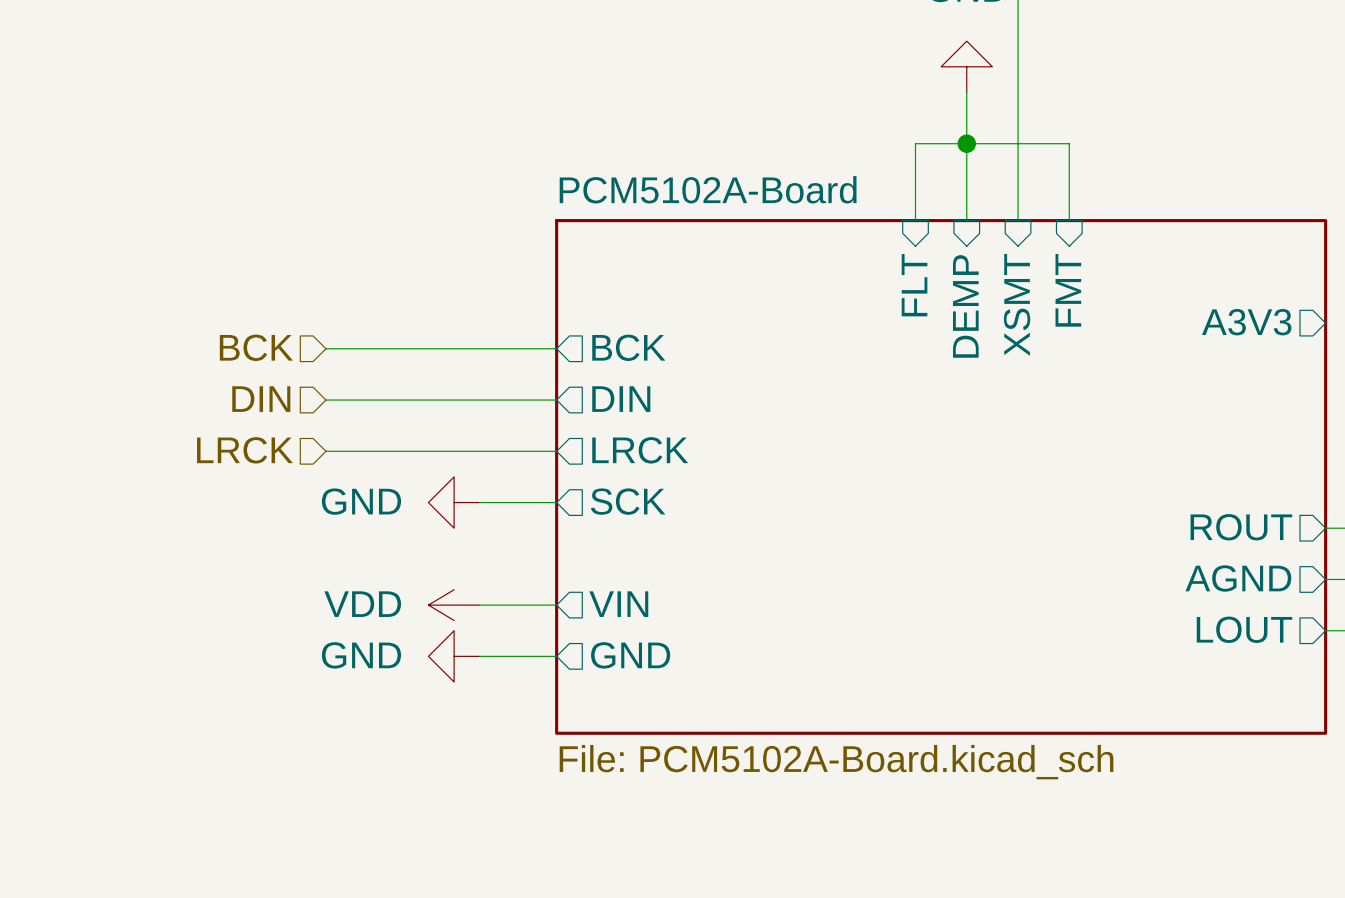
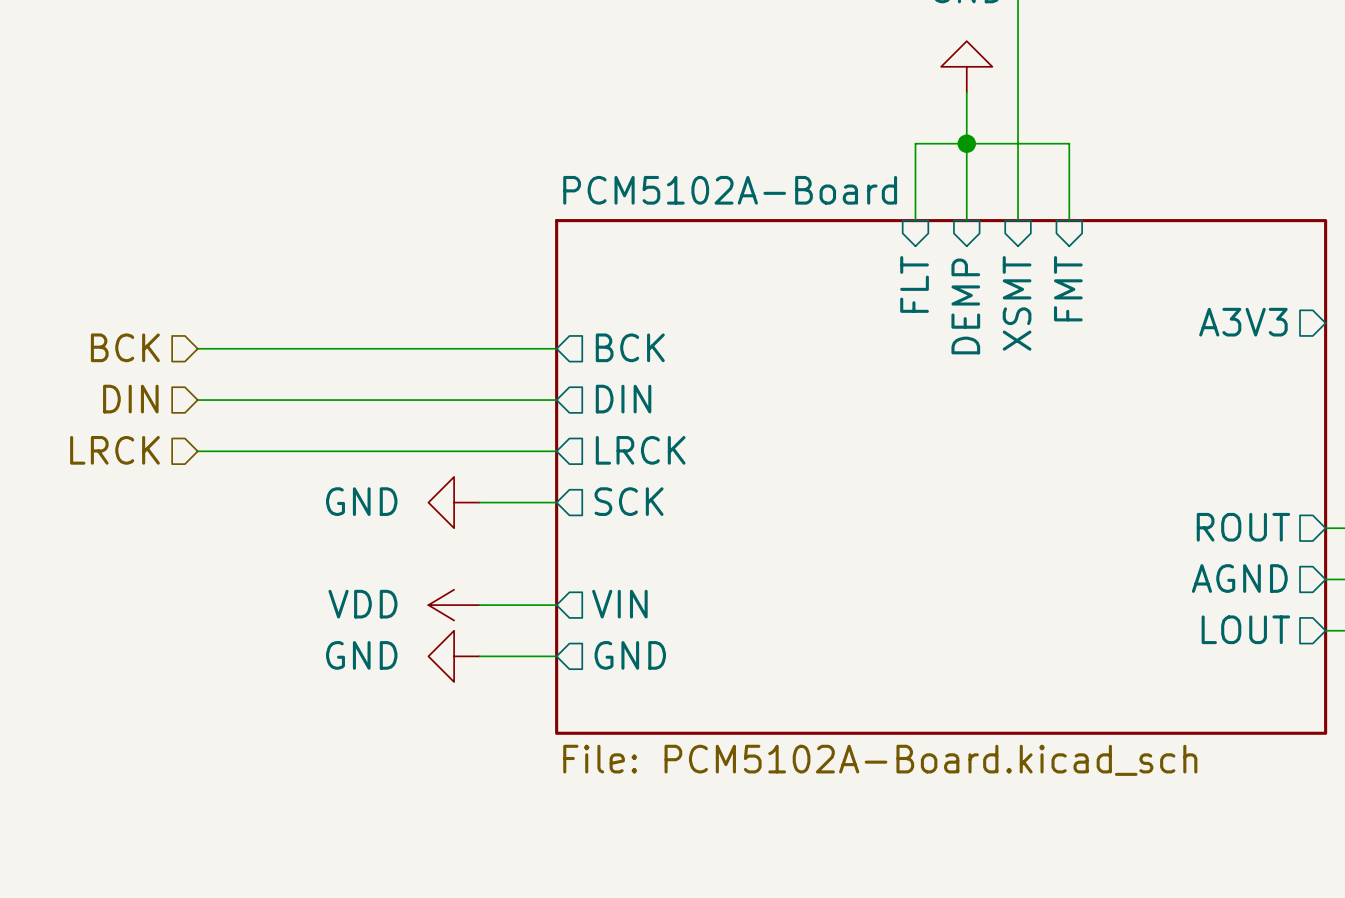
hierarchical label position: BCK (256, 347) -> BCK (125, 347)
wire: none -> (197, 348) (325, 348)
hierarchical label position: DIN (261, 399) -> DIN (130, 399)
wire: none -> (197, 400) (325, 400)
hierarchical label position: LRCK (245, 450) -> LRCK (114, 450)
wire: none -> (197, 451) (325, 451)

